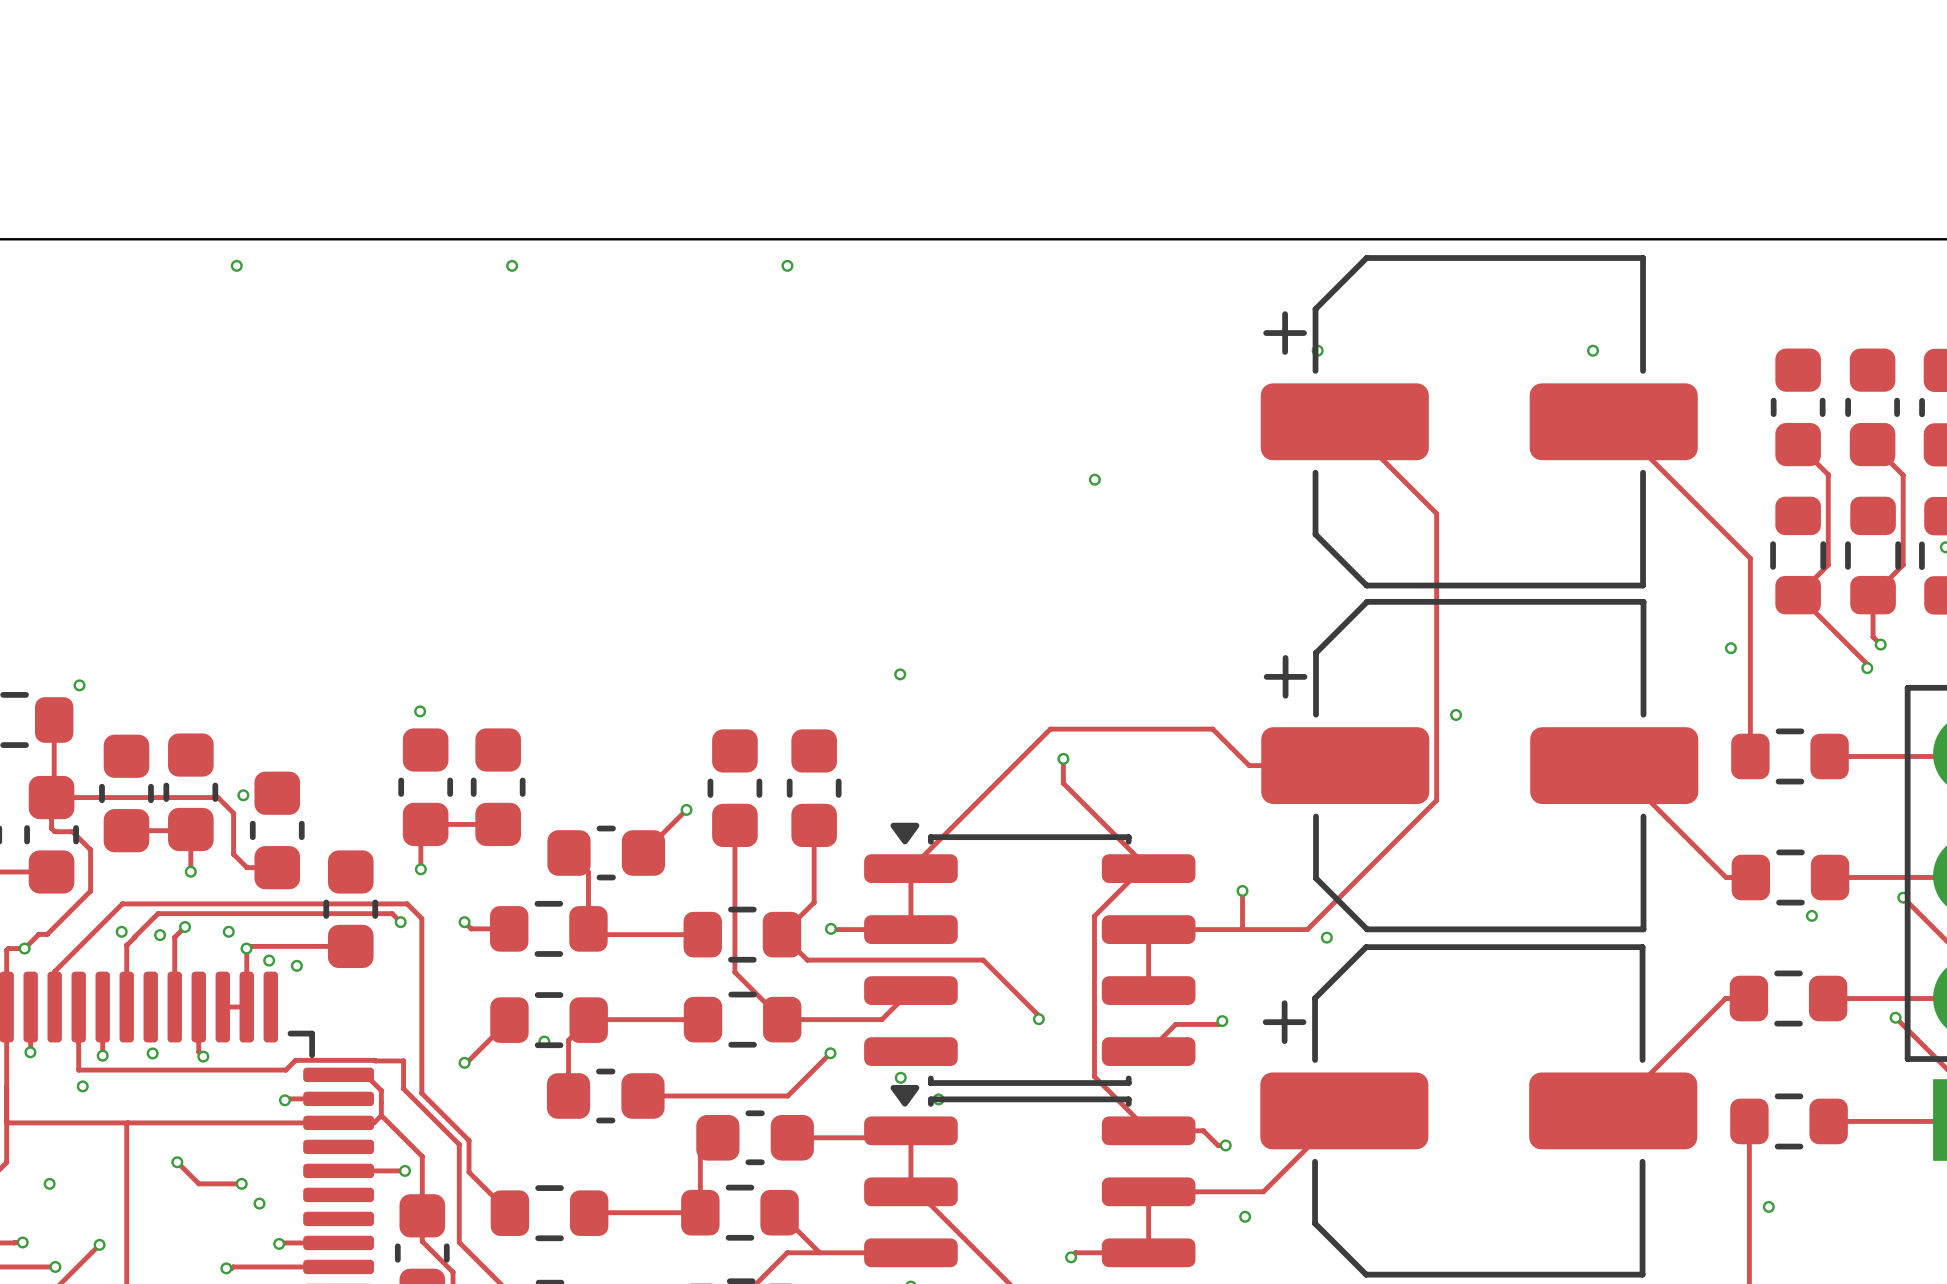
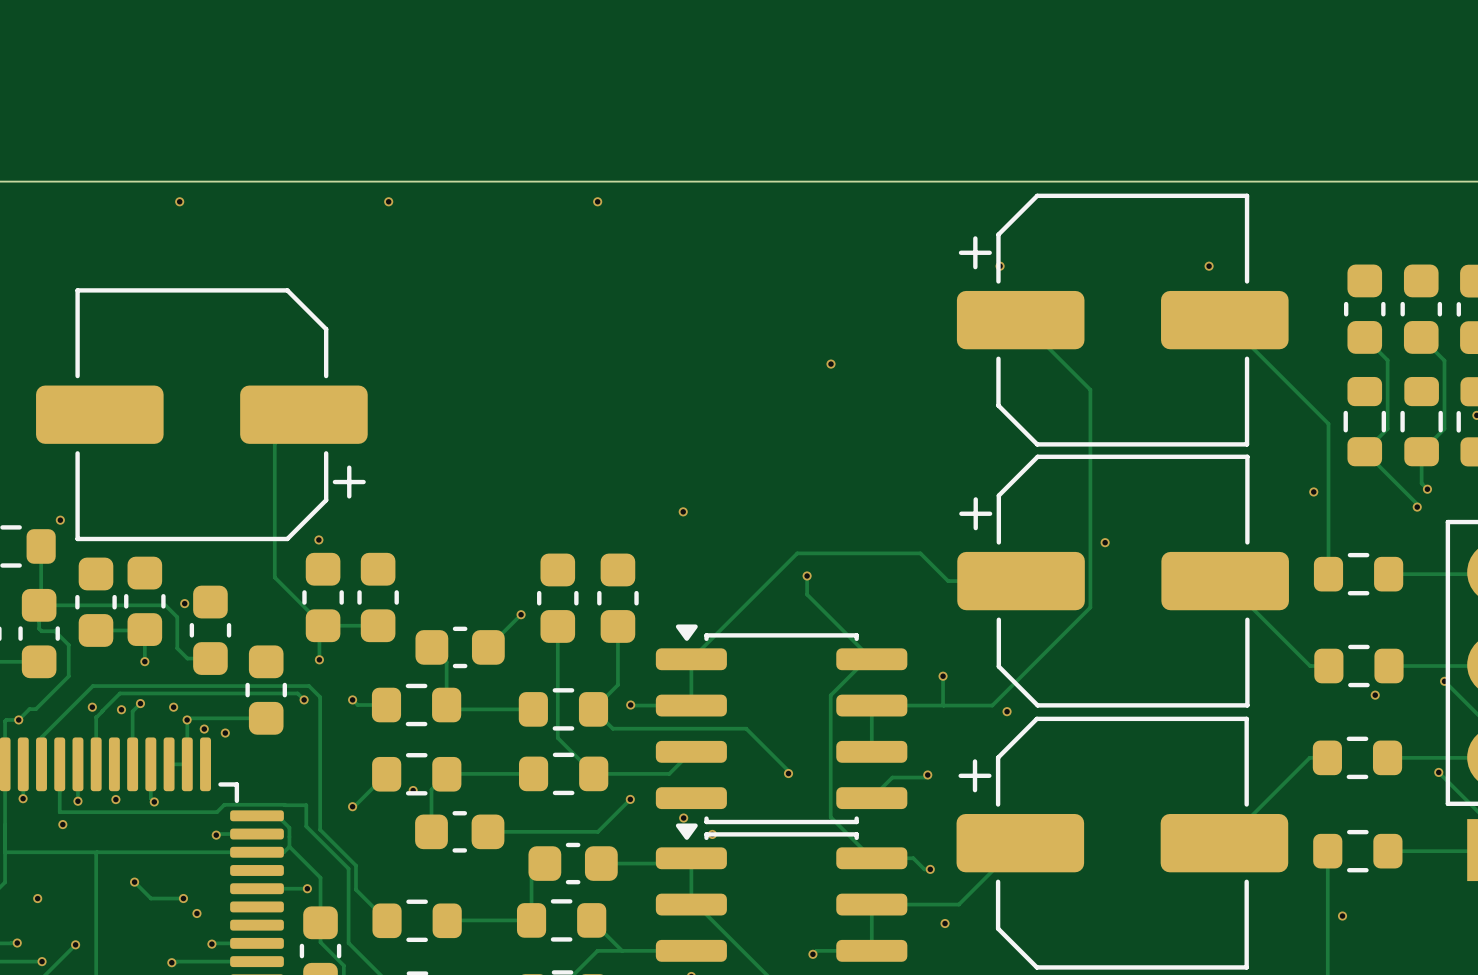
part: none -> (201, 414)
track: none -> (303, 414) (274, 443) (274, 577) (323, 625)

